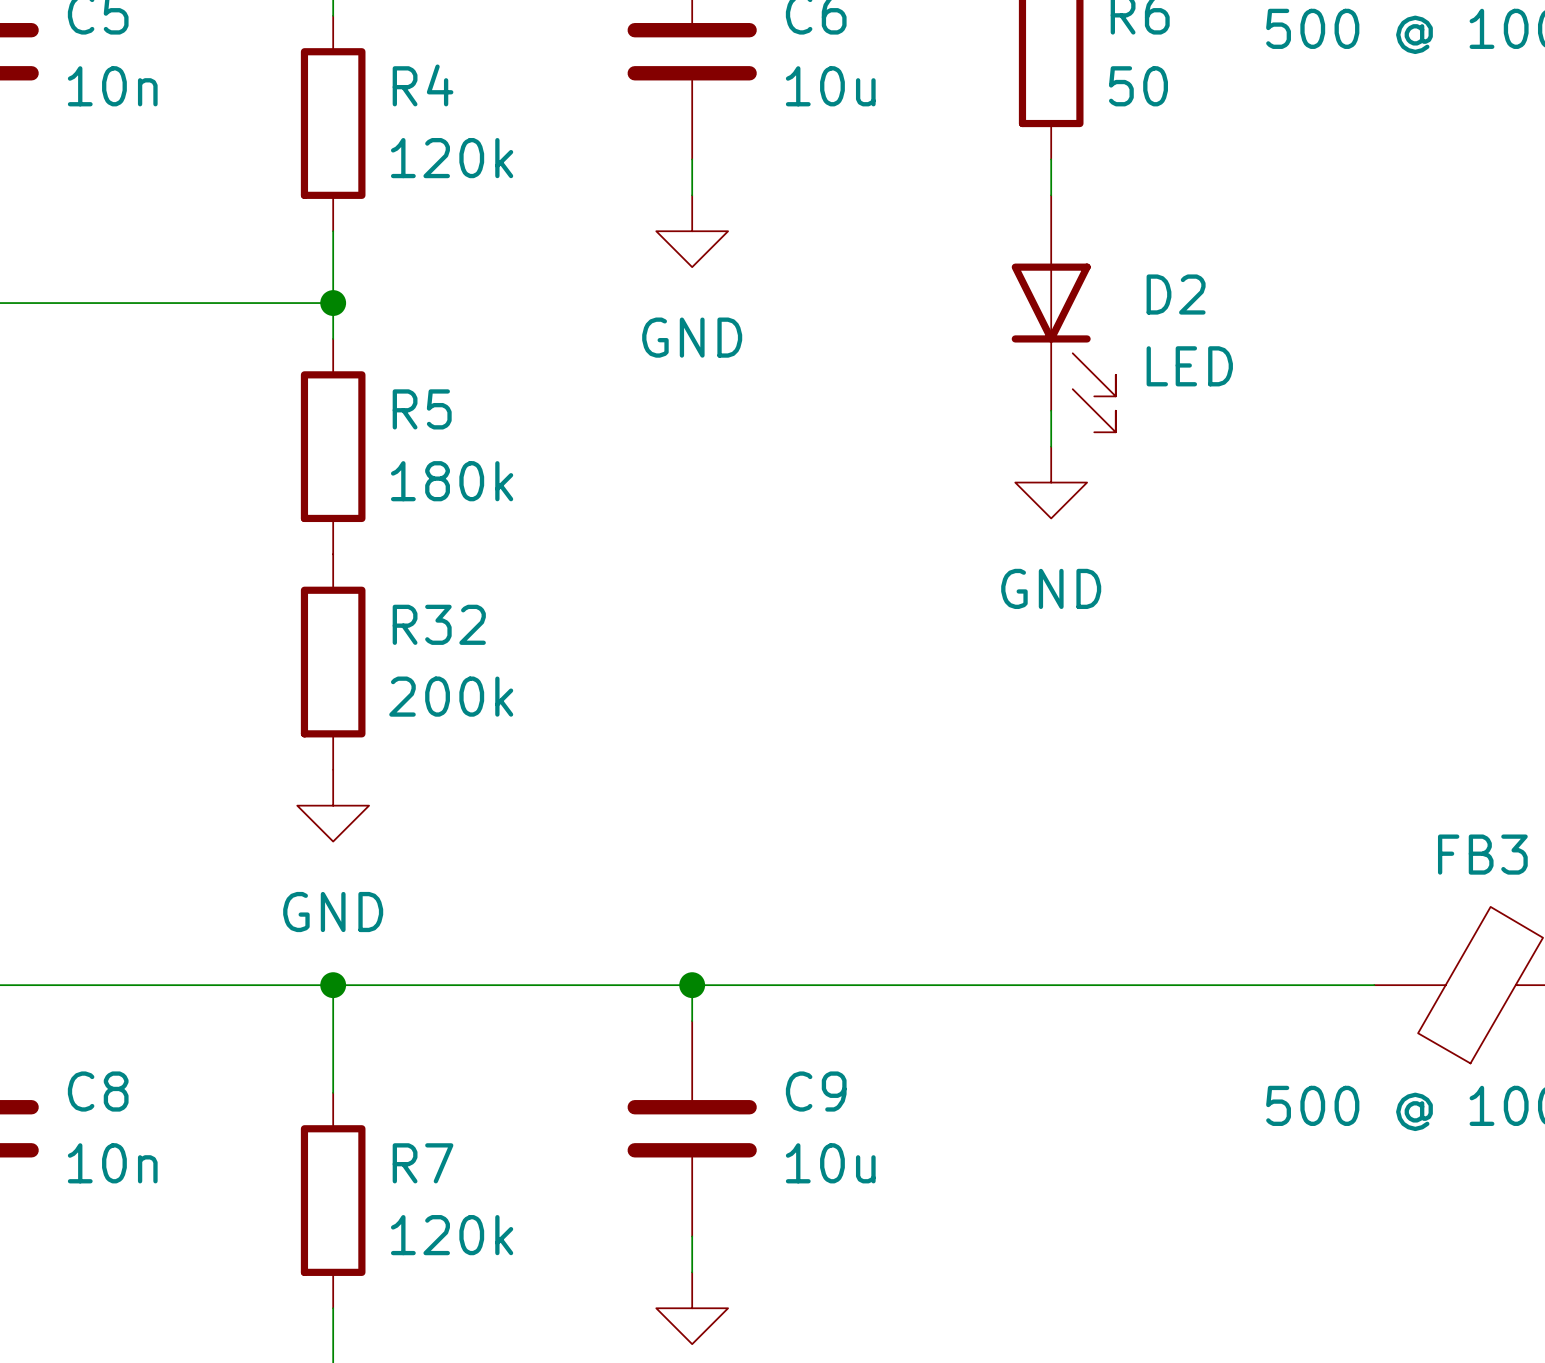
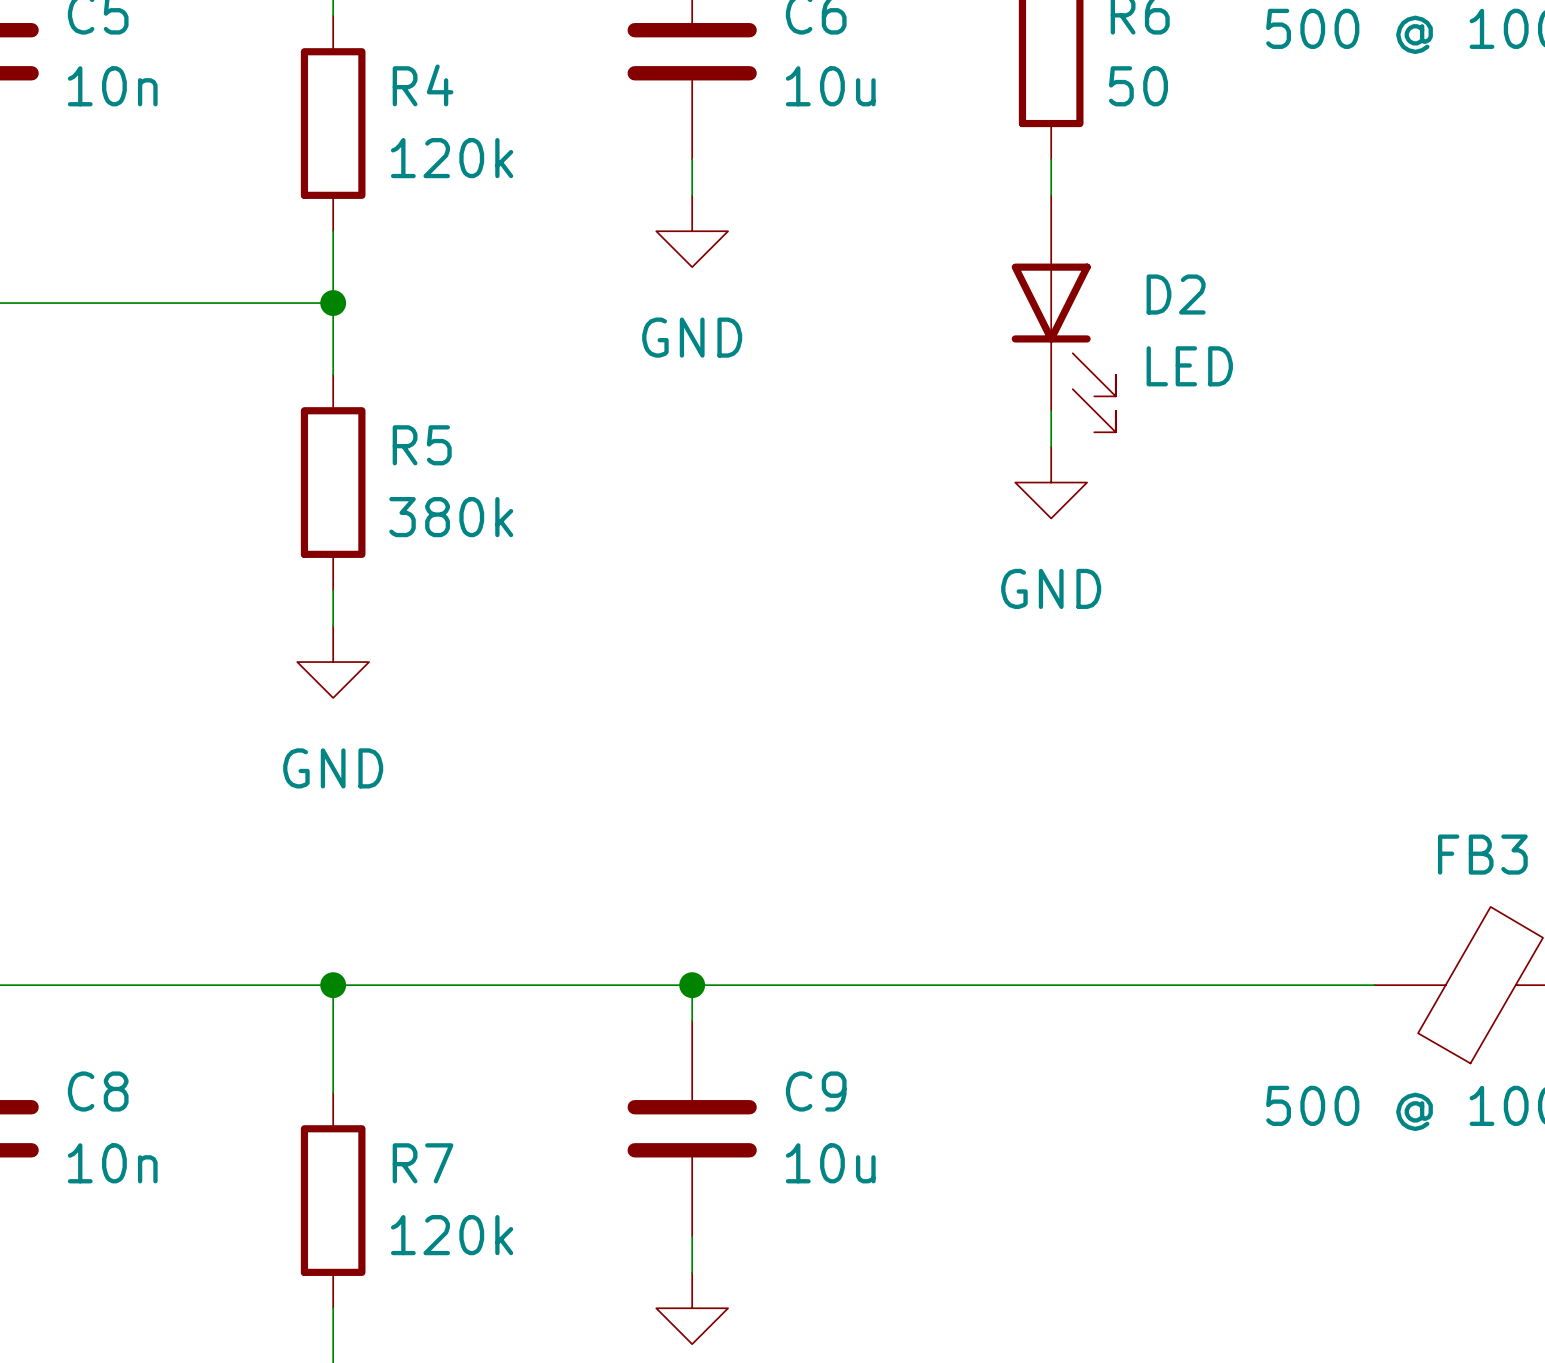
R5 position: (333, 446) -> (333, 482)
R5 value: 180k (452, 481) -> 380k (451, 517)
wire: none -> (333, 590) (333, 626)
R32: 200k (333, 662) -> none
power symbol position: GND (333, 805) -> GND (333, 662)

